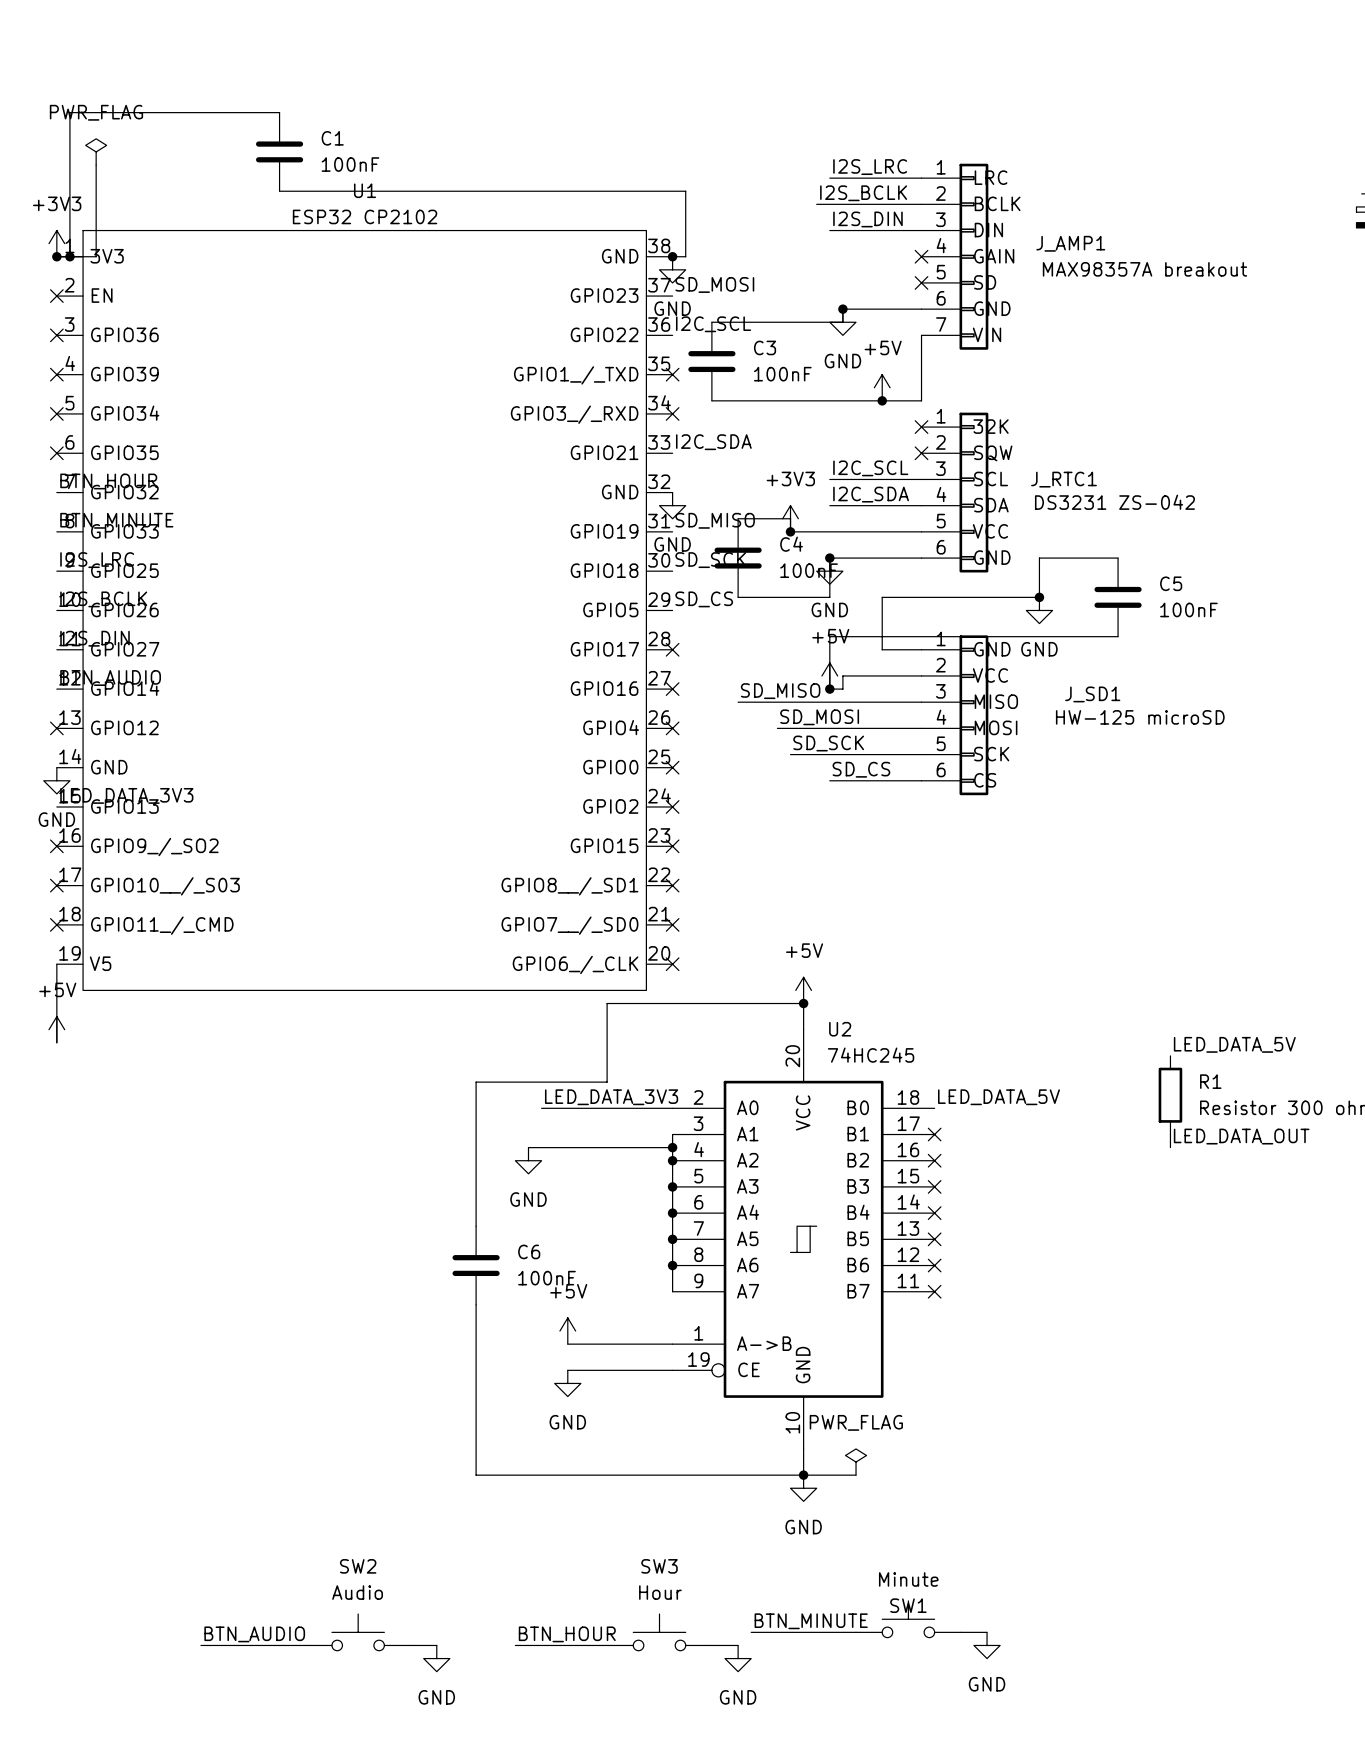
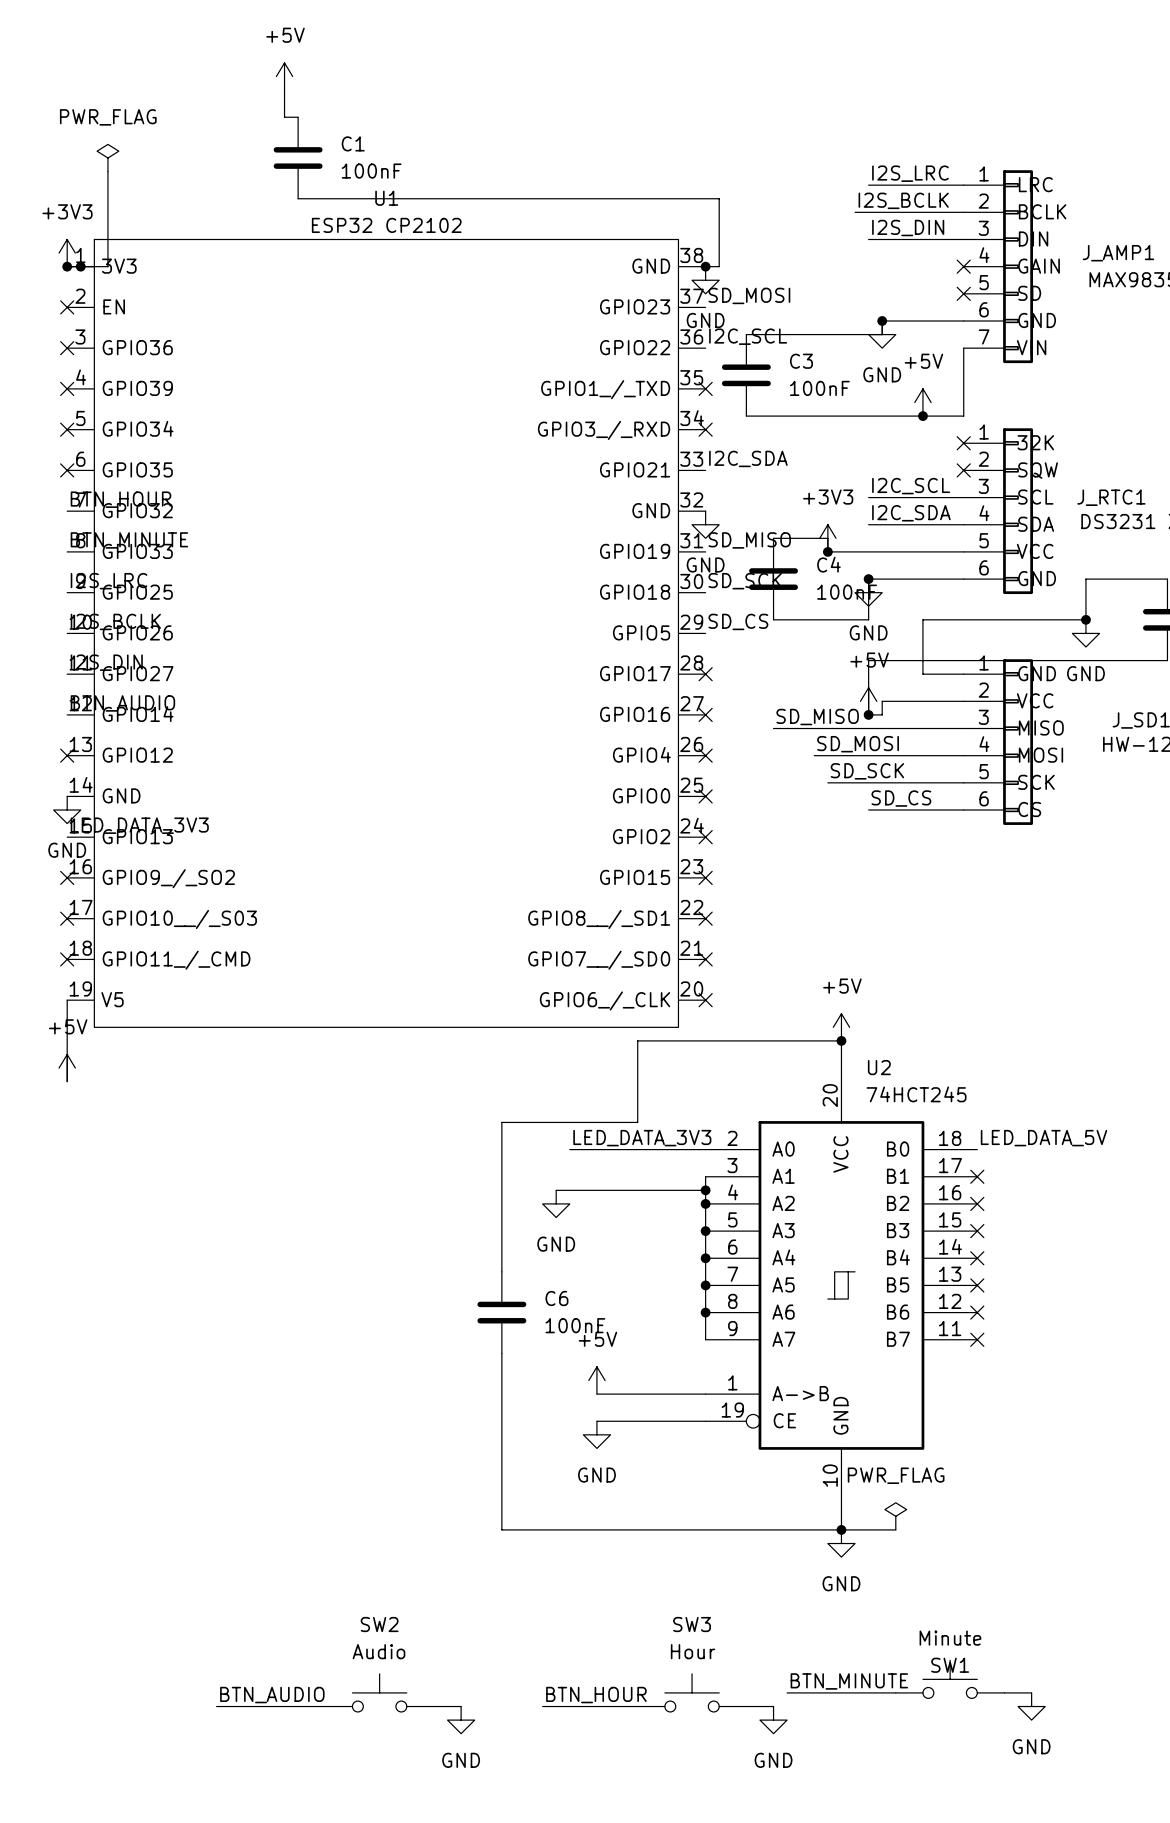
power symbol: none -> +5V (284, 76)
wire: (266, 112) (69, 112) (69, 256) -> (284, 117) (284, 90)
U2 value: 74HC245 (871, 1055) -> 74HCT245 (916, 1094)

